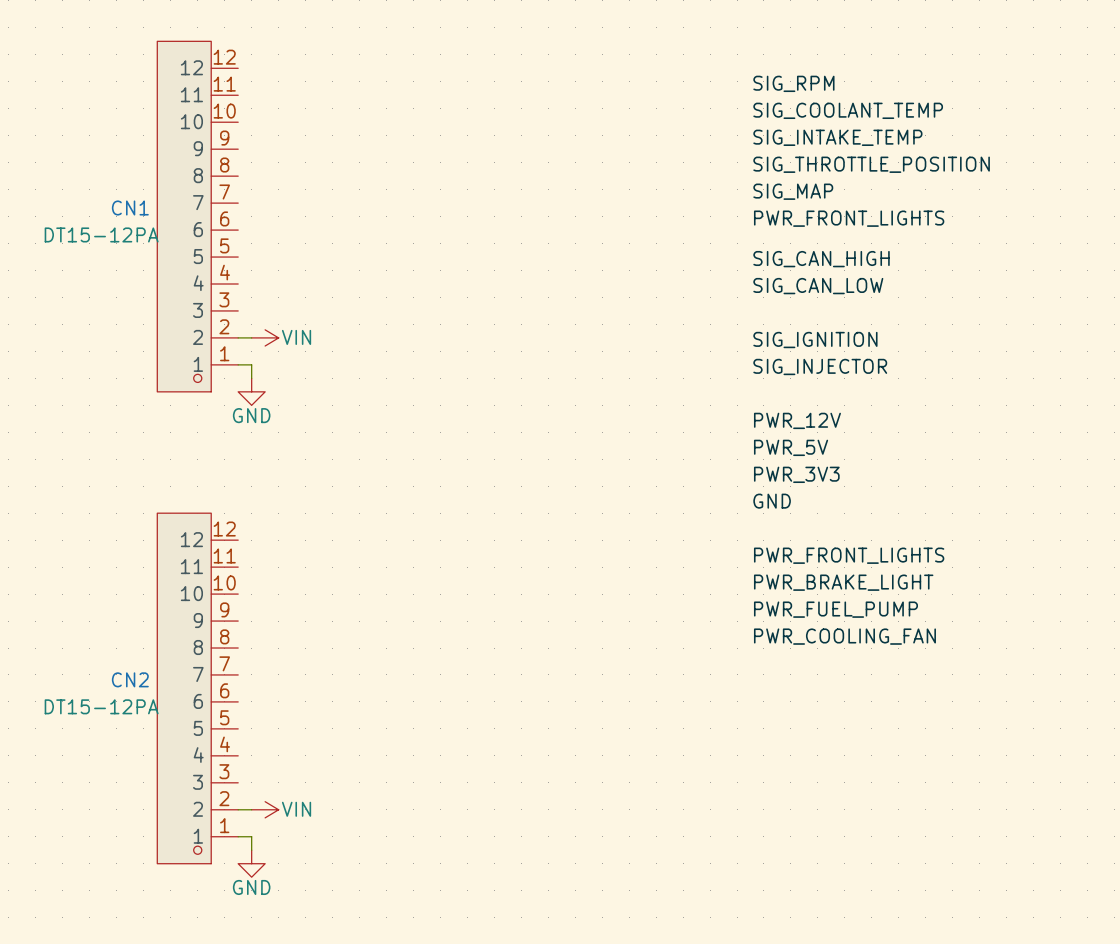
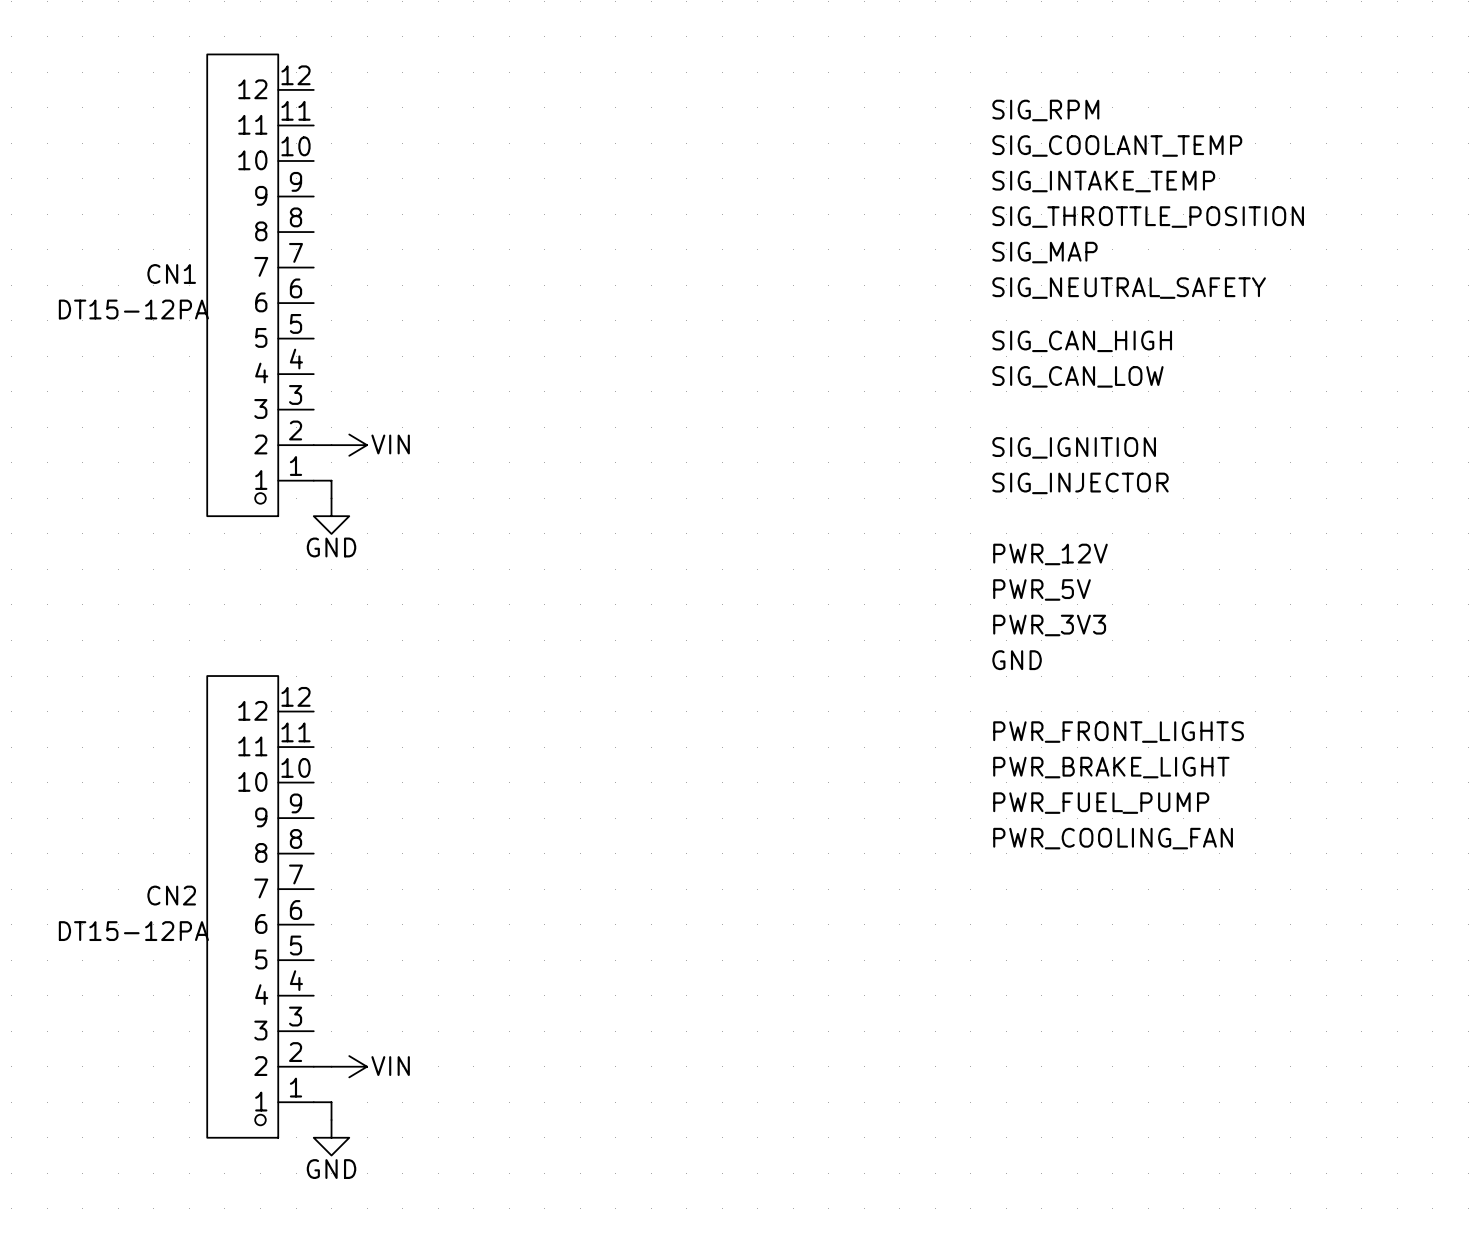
label: PWR_FRONT_LIGHTS (849, 218) -> SIG_NEUTRAL_SAFETY (1129, 288)

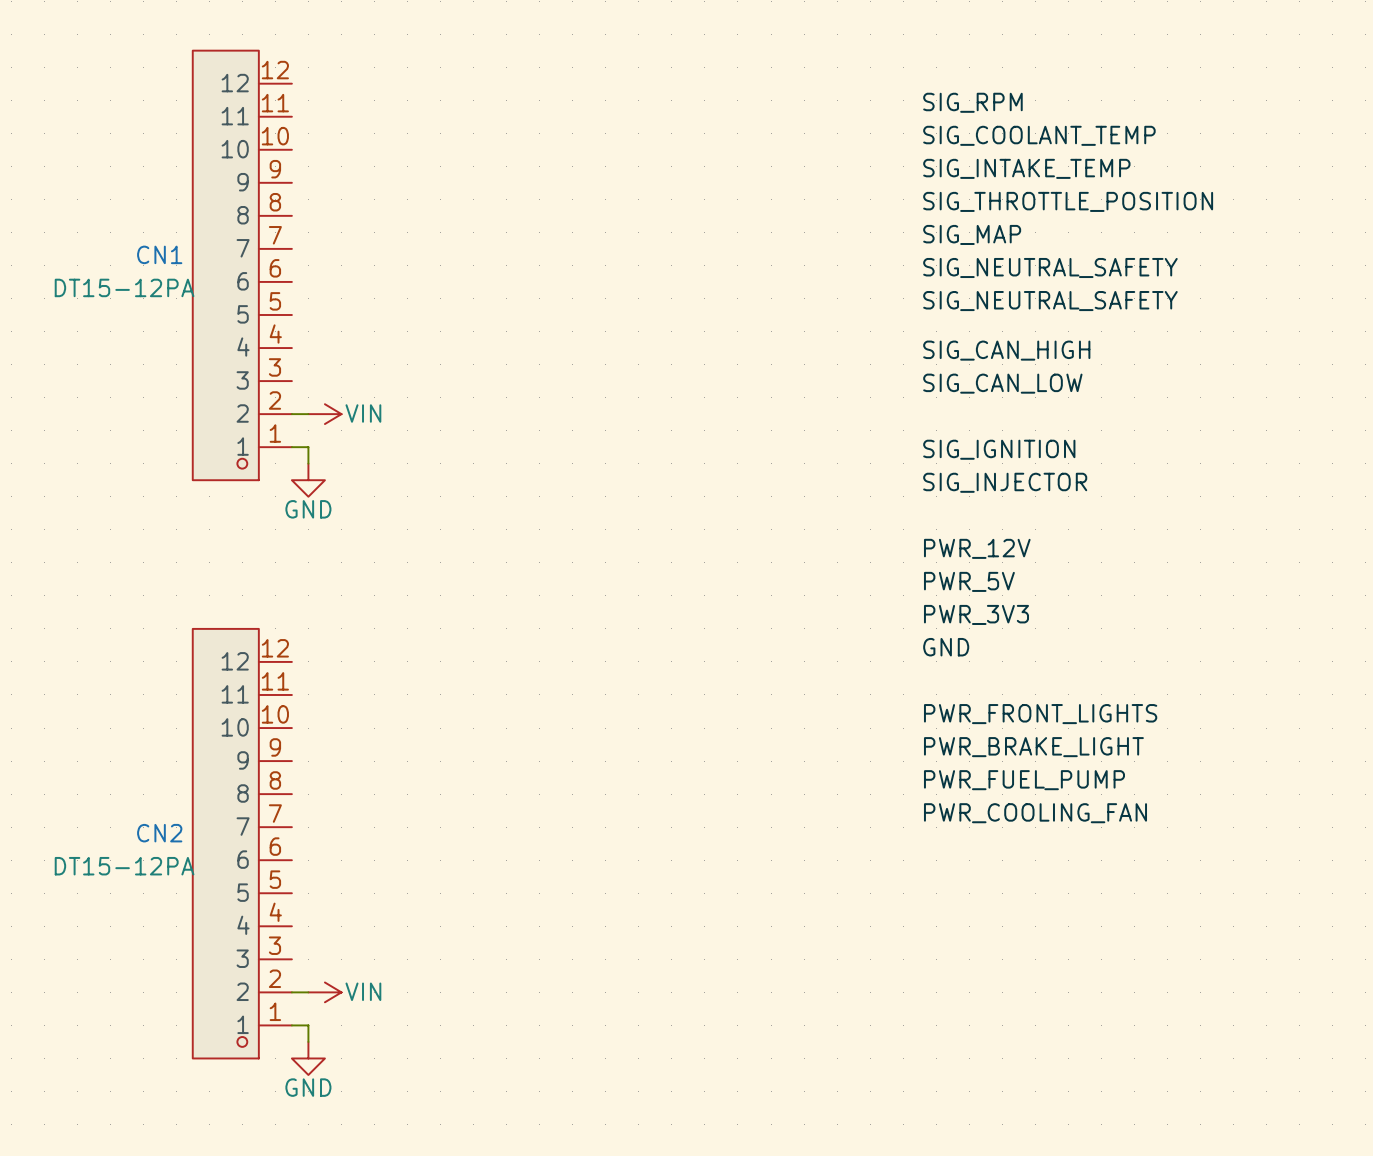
label: none -> SIG_NEUTRAL_SAFETY (1050, 301)
label: SIG_CAN_HIGH (1082, 341) -> none
label: SIG_CAN_LOW (1077, 376) -> SIG_CAN_HIGH (1006, 350)
label: none -> SIG_CAN_LOW (1002, 383)
label: SIG_IGNITION (1074, 447) -> none
label: SIG_INJECTOR (1080, 483) -> SIG_IGNITION (999, 449)
label: none -> SIG_INJECTOR (1005, 482)
label: PWR_12V (1050, 554) -> none
label: PWR_5V (1042, 589) -> PWR_12V (977, 548)
label: PWR_3V3 (1049, 625) -> PWR_5V (969, 581)
label: GND (1017, 660) -> PWR_3V3 (976, 614)
label: none -> GND (946, 647)
label: PWR_FRONT_LIGHTS (1118, 732) -> none
label: PWR_BRAKE_LIGHT (1111, 767) -> PWR_FRONT_LIGHTS (1040, 714)
label: PWR_FUEL_PUMP (1101, 803) -> PWR_BRAKE_LIGHT (1033, 747)
label: PWR_COOLING_FAN (1113, 838) -> PWR_FUEL_PUMP (1024, 780)
label: none -> PWR_COOLING_FAN (1035, 813)

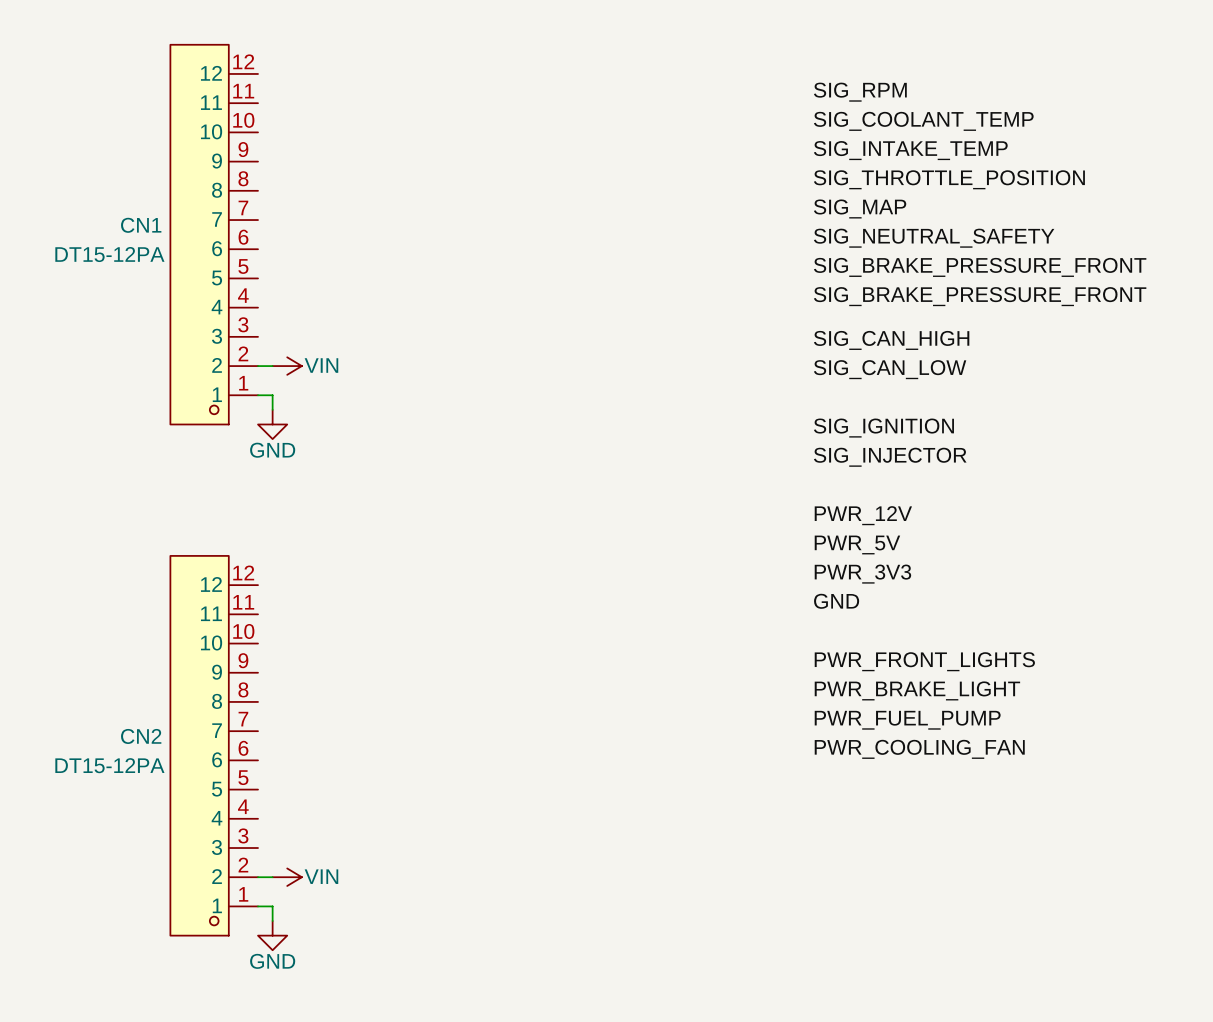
label: SIG_NEUTRAL_SAFETY (1050, 301) -> SIG_BRAKE_PRESSURE_FRONT (980, 267)
label: none -> SIG_BRAKE_PRESSURE_FRONT (980, 296)
label: SIG_CAN_HIGH (1006, 350) -> none
label: SIG_CAN_LOW (1002, 383) -> SIG_CAN_HIGH (891, 340)
label: none -> SIG_CAN_LOW (890, 369)
label: SIG_IGNITION (999, 449) -> none
label: SIG_INJECTOR (1005, 482) -> SIG_IGNITION (883, 428)
label: none -> SIG_INJECTOR (890, 457)
label: PWR_12V (977, 548) -> none
label: PWR_5V (969, 581) -> PWR_12V (863, 515)
label: PWR_3V3 (976, 614) -> PWR_5V (857, 544)
label: GND (946, 647) -> PWR_3V3 (862, 574)
label: none -> GND (836, 601)
label: PWR_FRONT_LIGHTS (1040, 714) -> none
label: PWR_BRAKE_LIGHT (1033, 747) -> PWR_FRONT_LIGHTS (924, 661)
label: PWR_FUEL_PUMP (1024, 780) -> PWR_BRAKE_LIGHT (917, 690)
label: PWR_COOLING_FAN (1035, 813) -> PWR_FUEL_PUMP (907, 720)
label: none -> PWR_COOLING_FAN (919, 749)

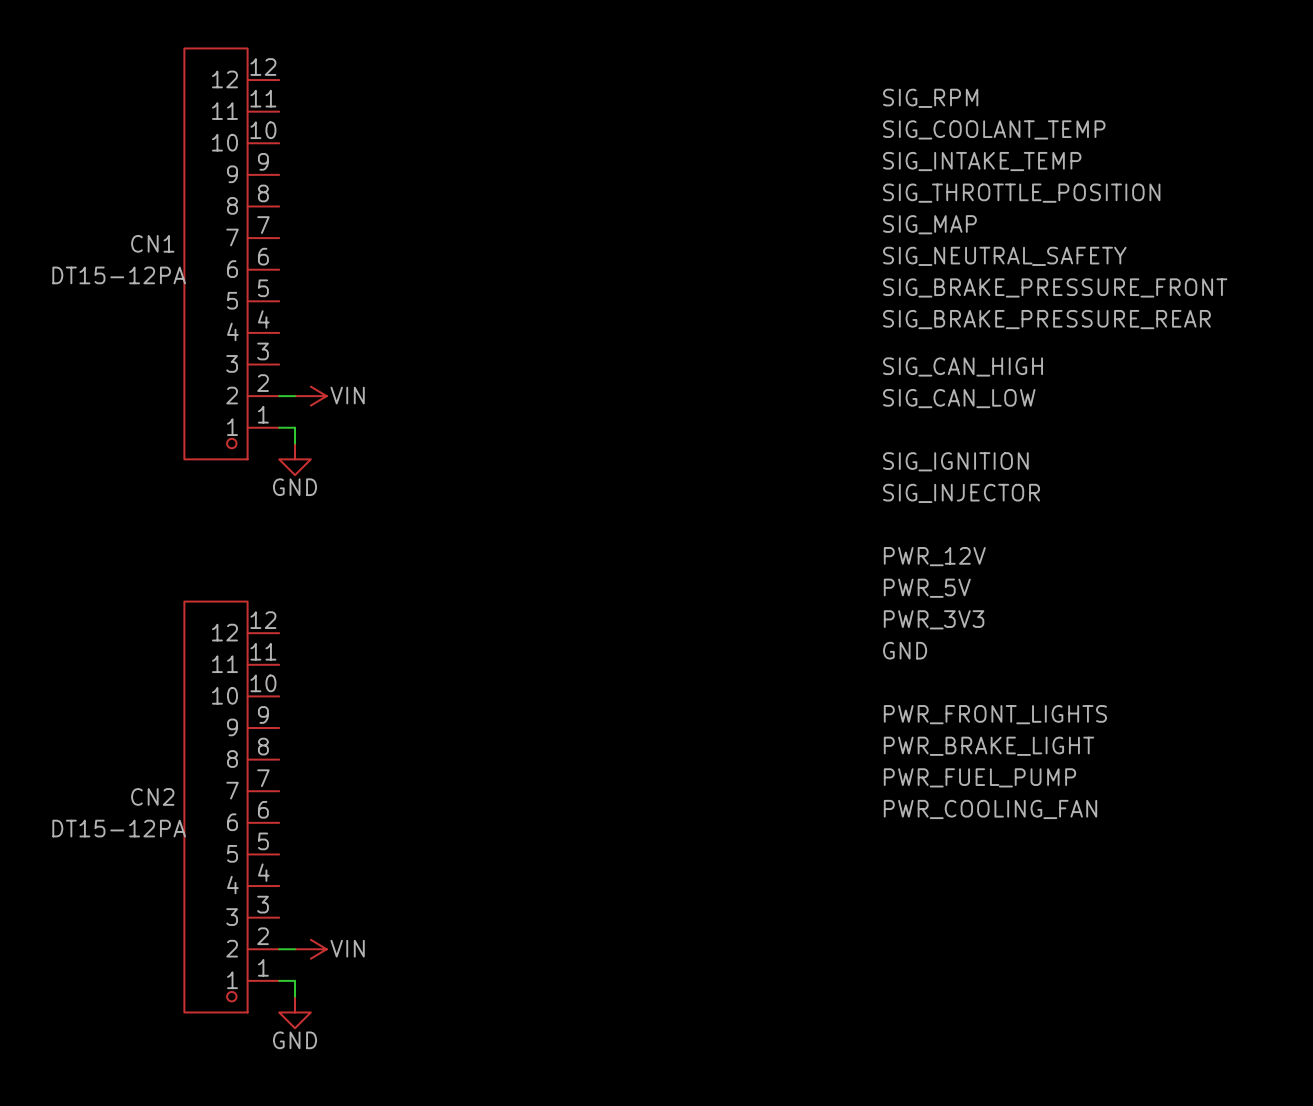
label: SIG_BRAKE_PRESSURE_FRONT (980, 296) -> SIG_BRAKE_PRESSURE_REAR (1046, 319)

